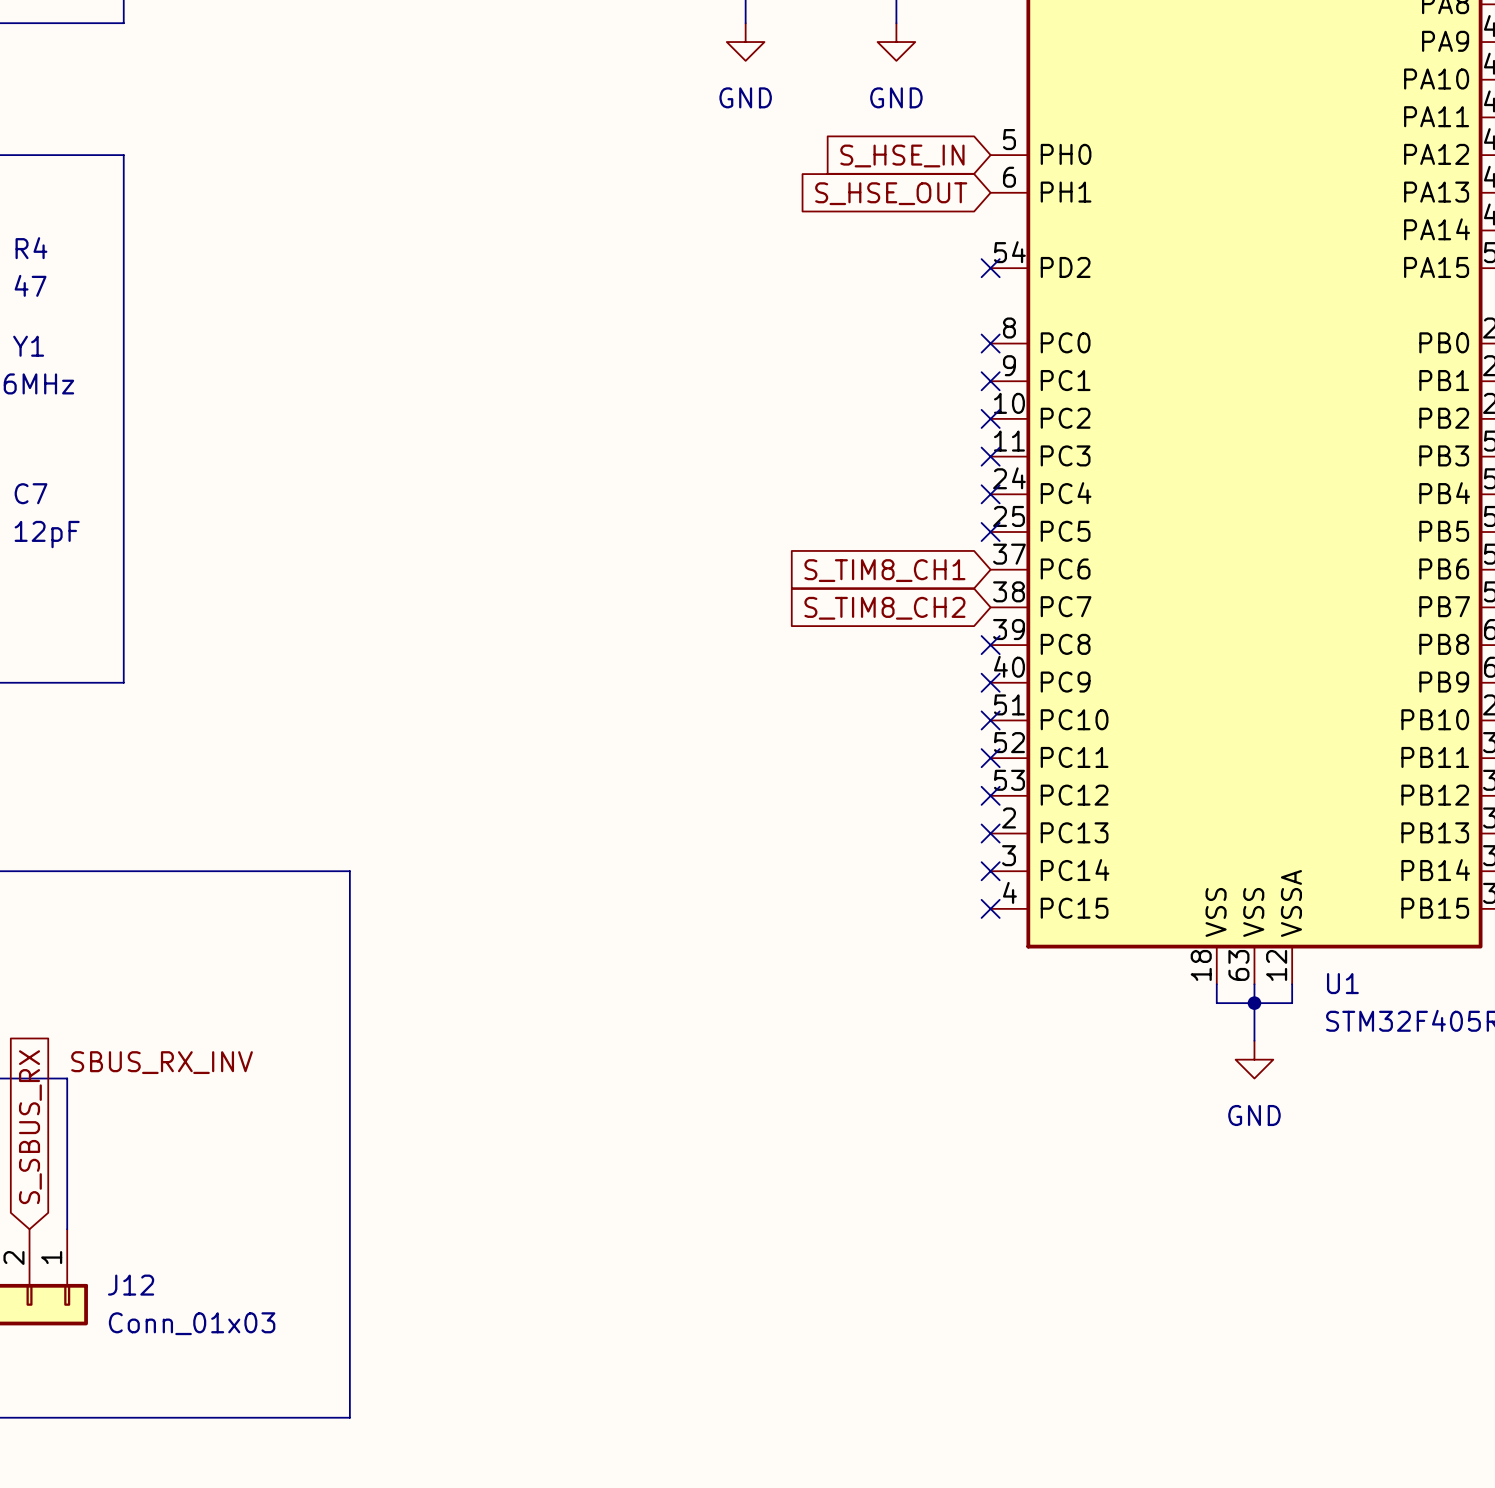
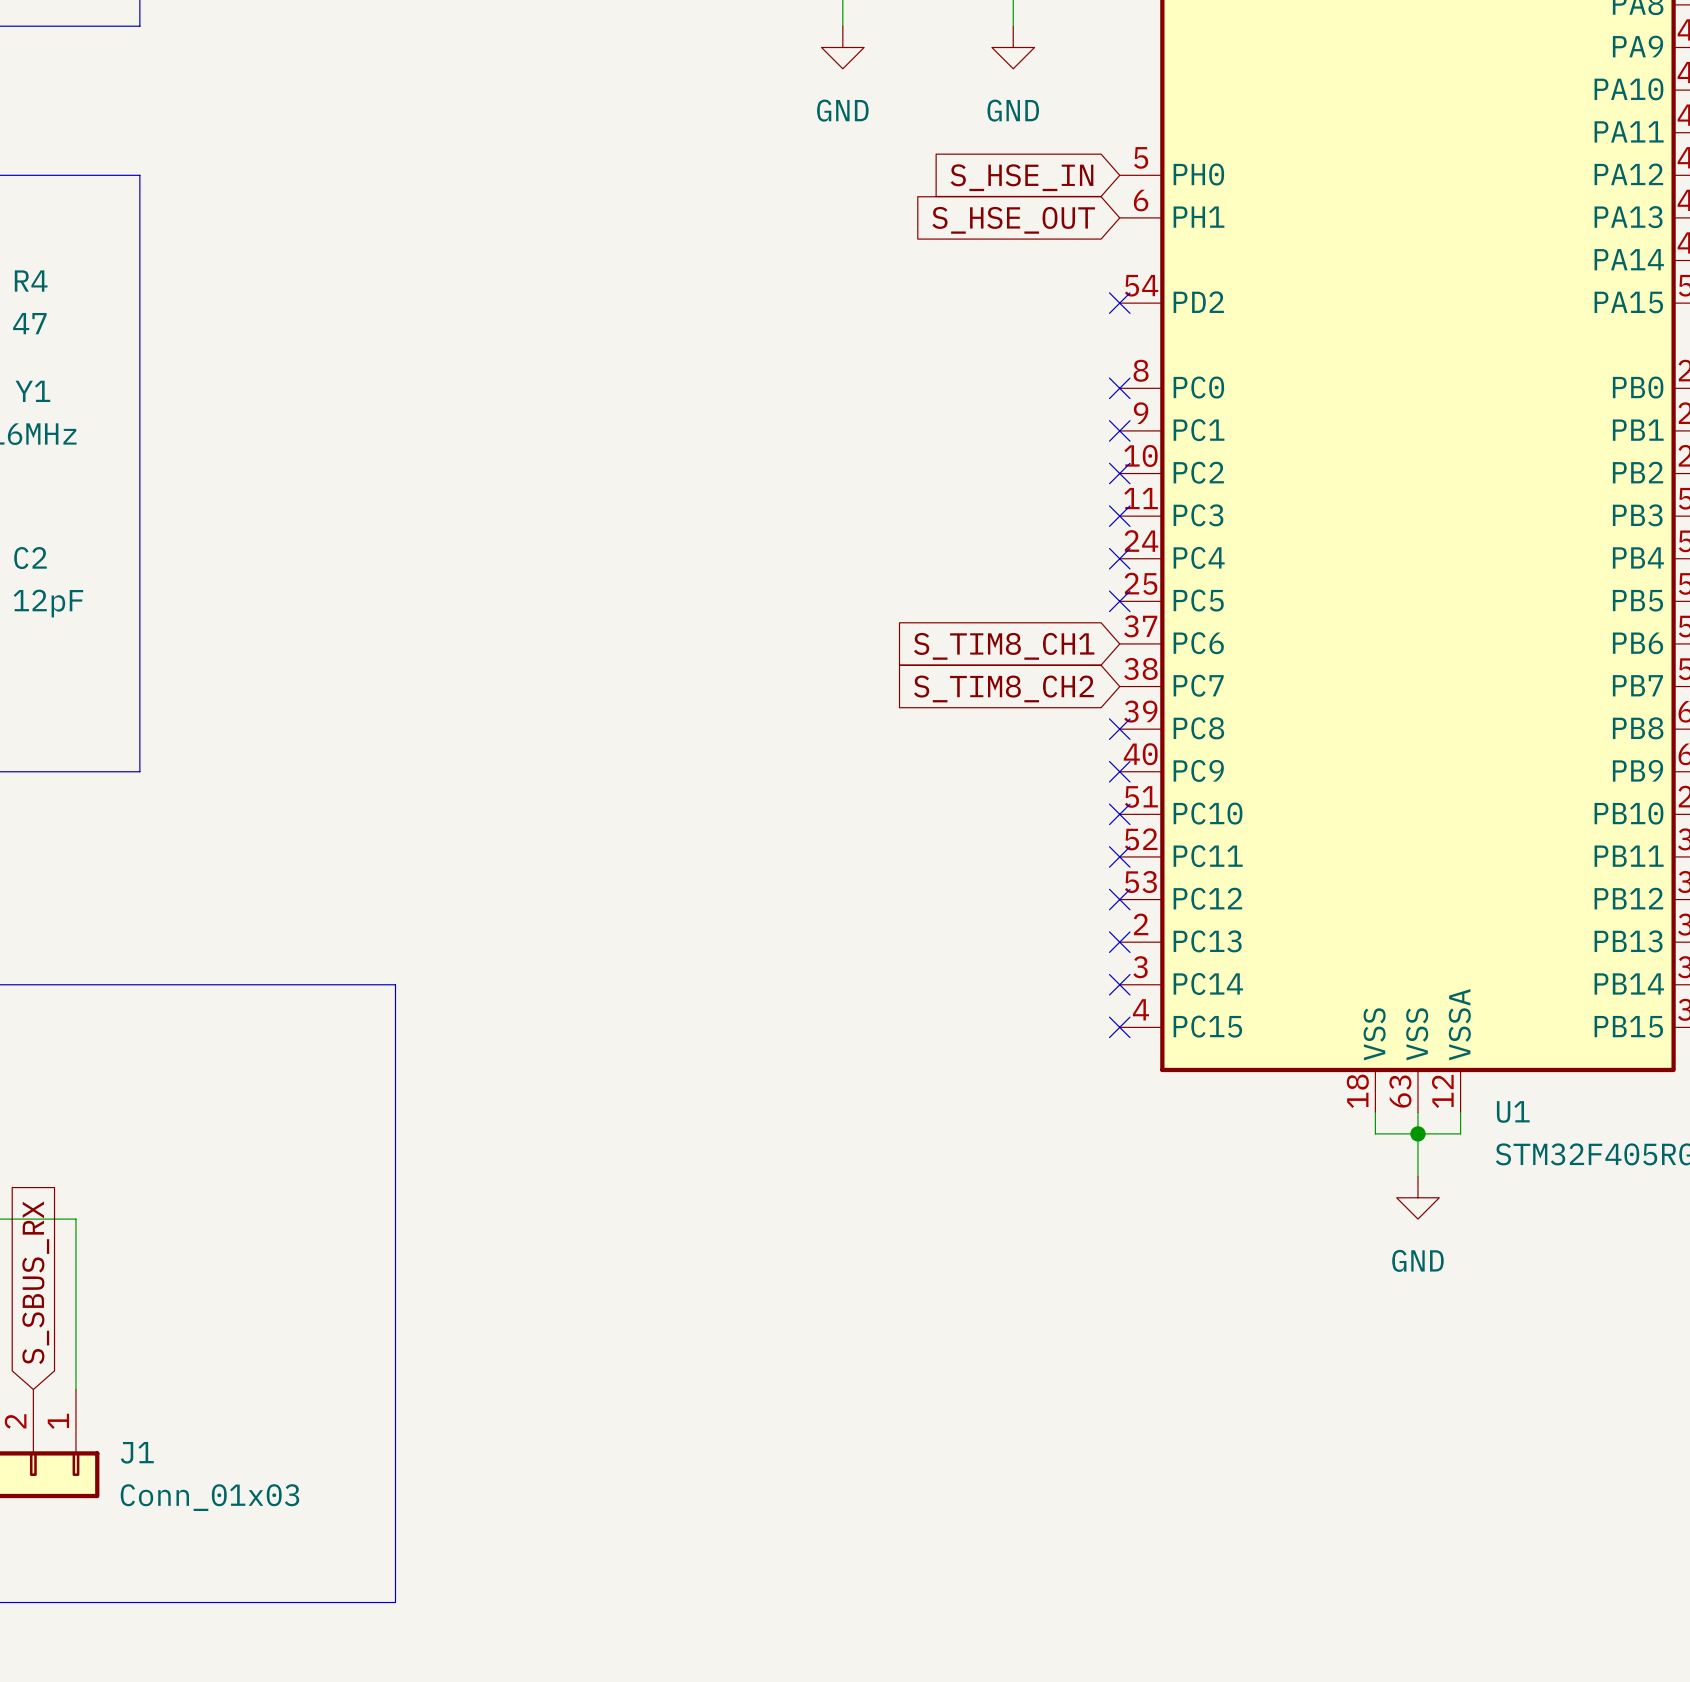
C7 name: C7 (31, 493) -> C2 (30, 558)
label: SBUS_RX_INV (162, 1062) -> none
J12 name: J12 (131, 1285) -> J1 (137, 1452)

